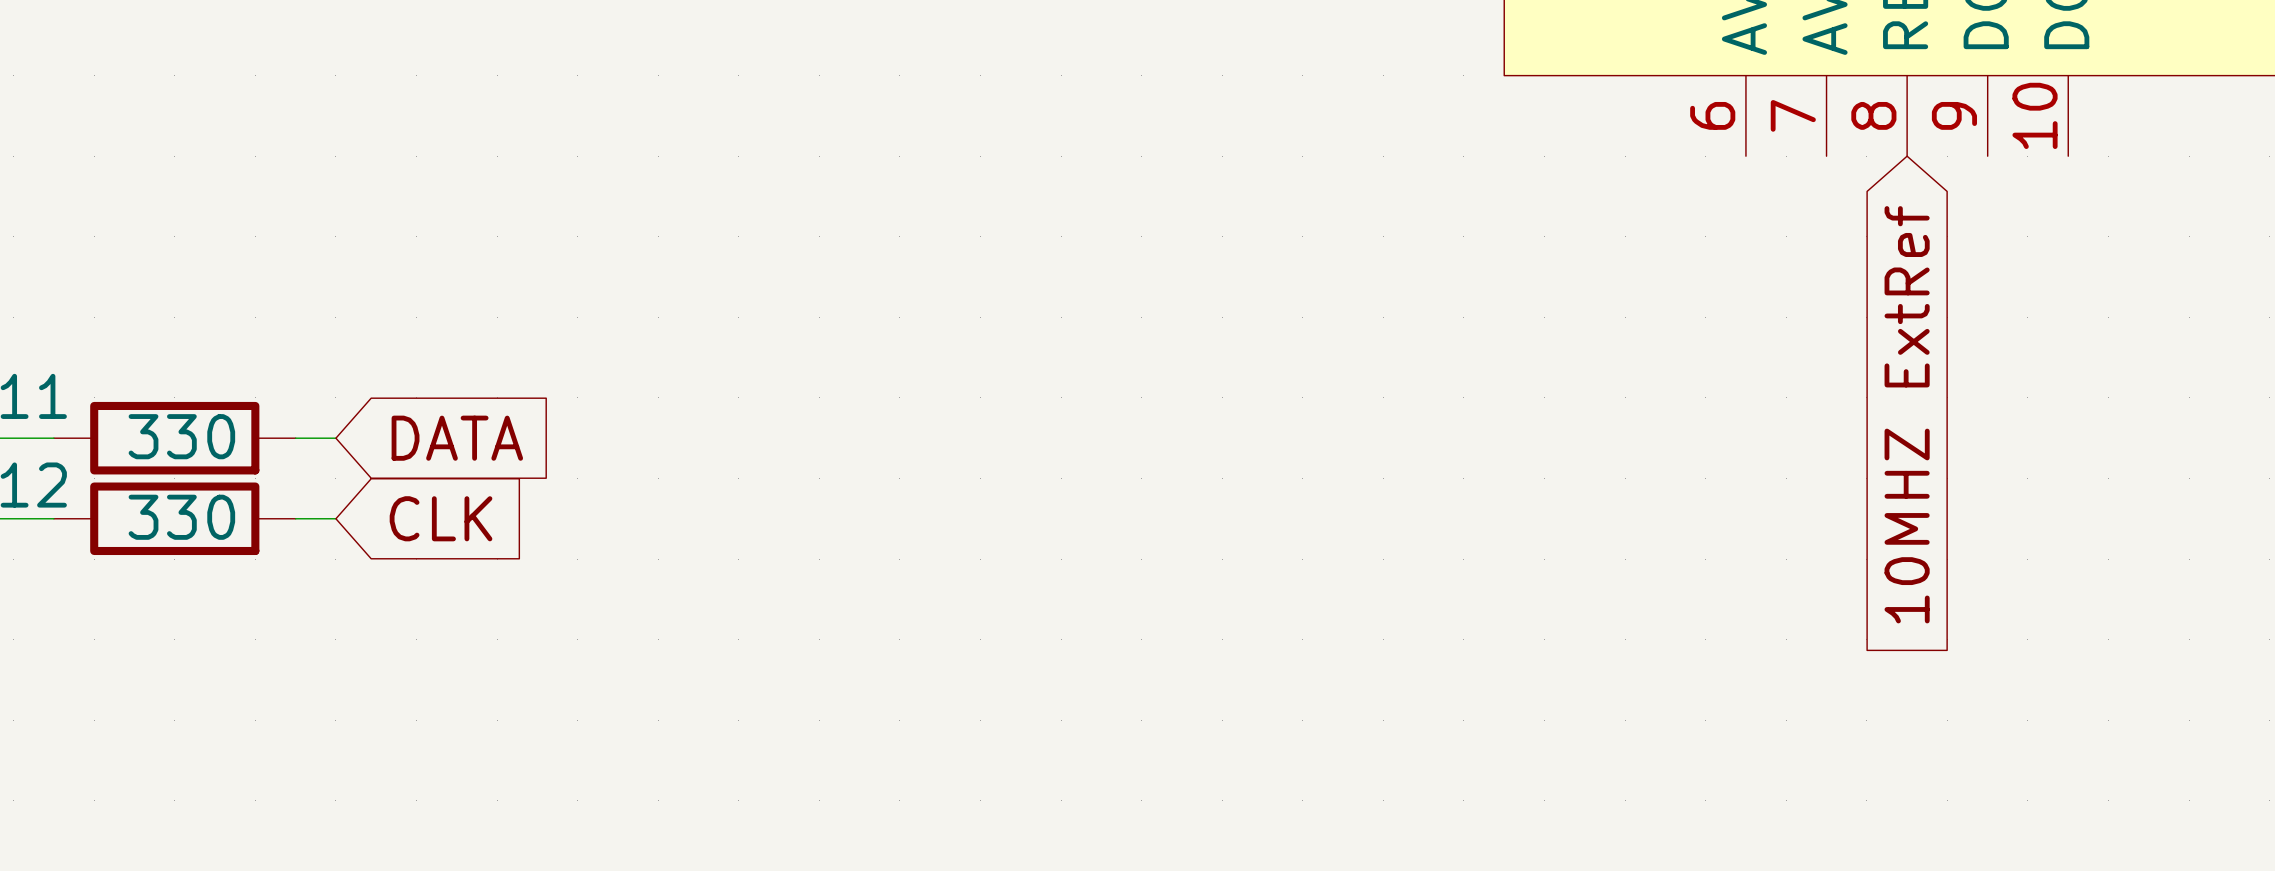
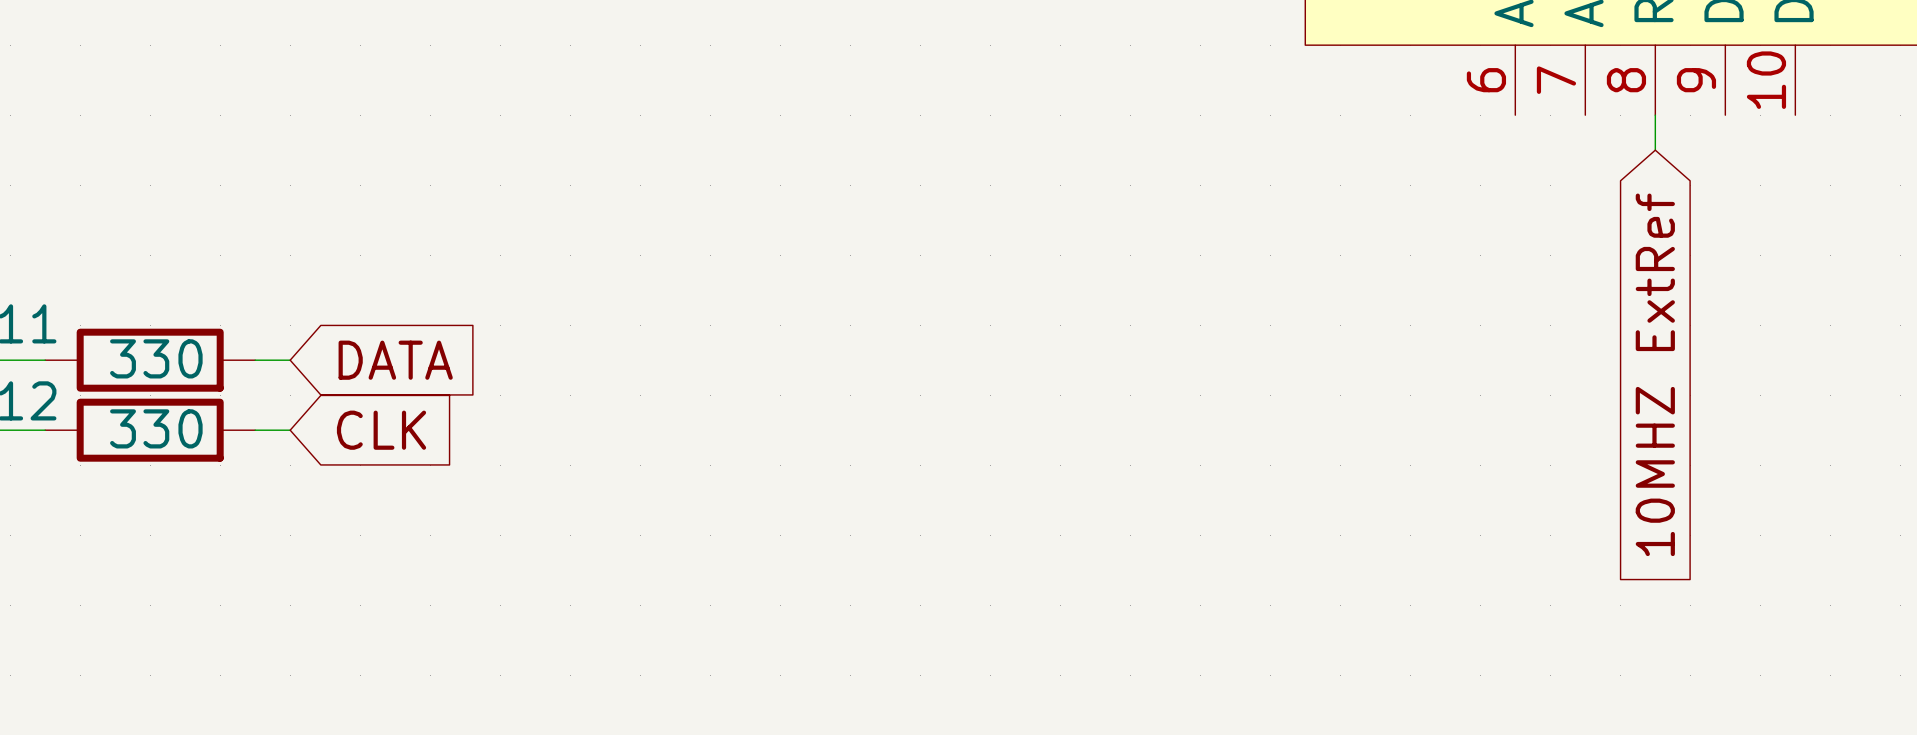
wire: none -> (1655, 115) (1655, 150)
global label position: 10MHZ ExtRef (1907, 414) -> 10MHZ ExtRef (1655, 374)

